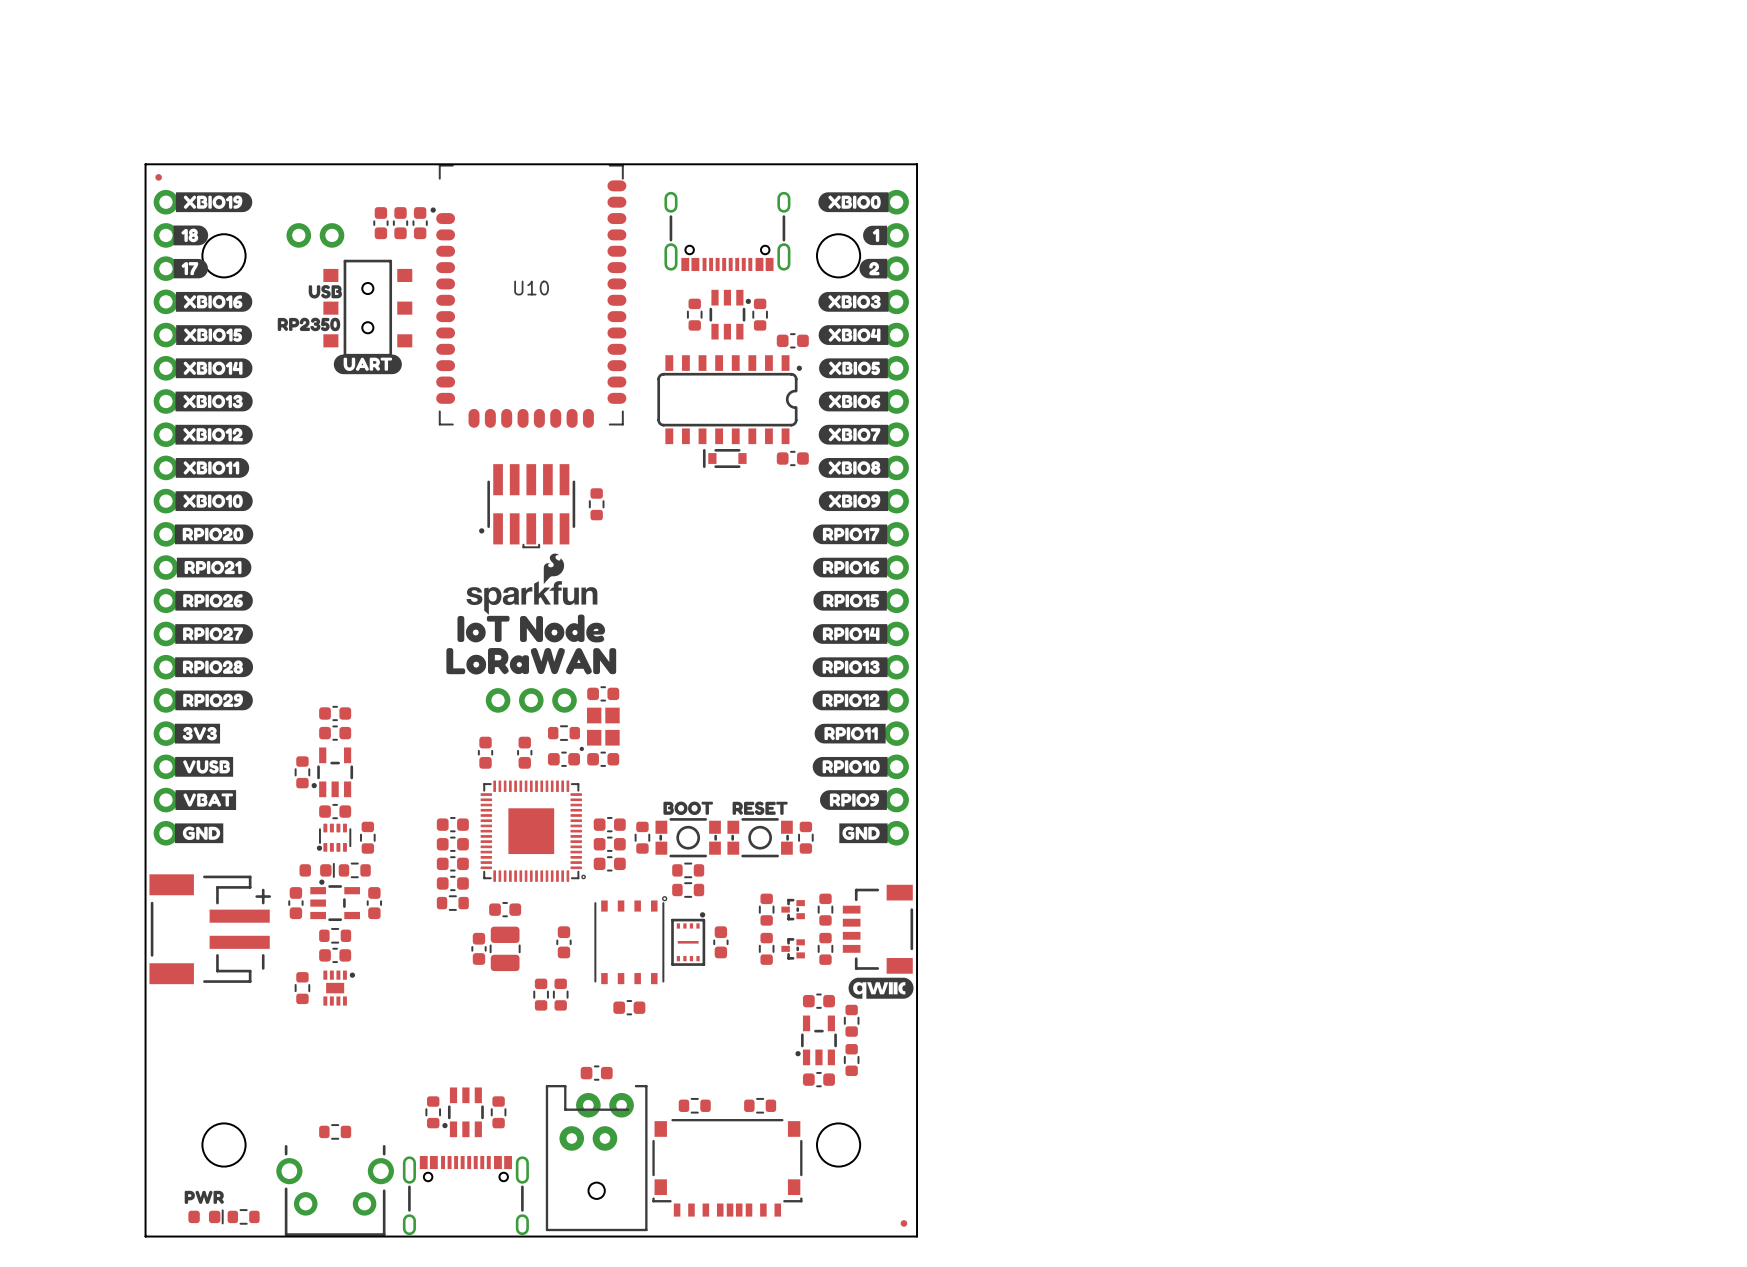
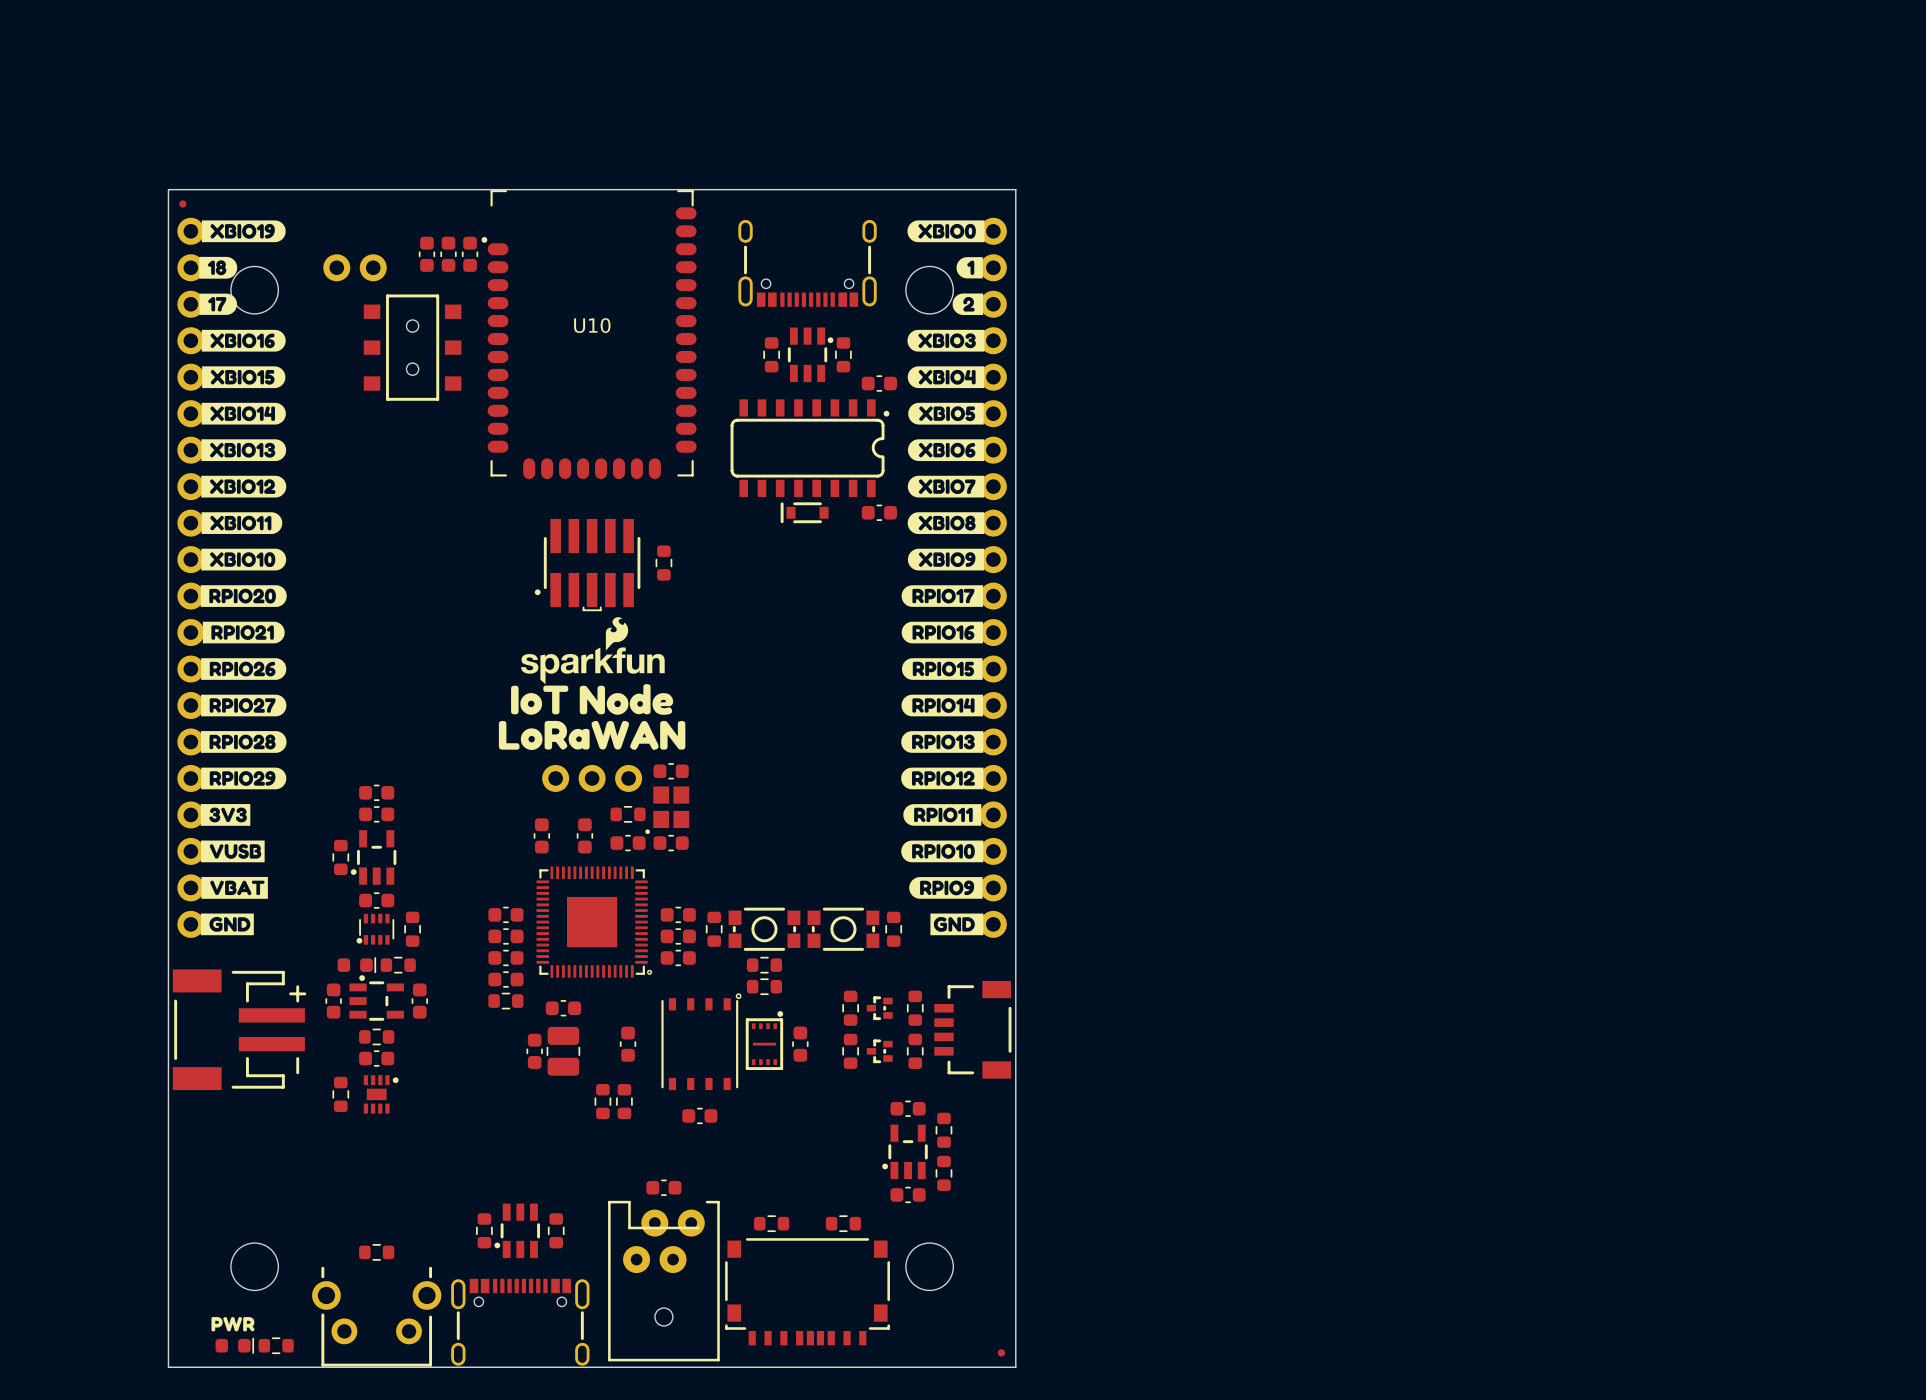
drawing: [308, 285, 342, 299] -> none
drawing: [277, 317, 341, 332] -> none
drawing: [333, 354, 402, 375] -> none
drawing: [663, 801, 713, 816] -> none
drawing: [732, 801, 788, 816] -> none
drawing: [848, 977, 914, 999] -> none

